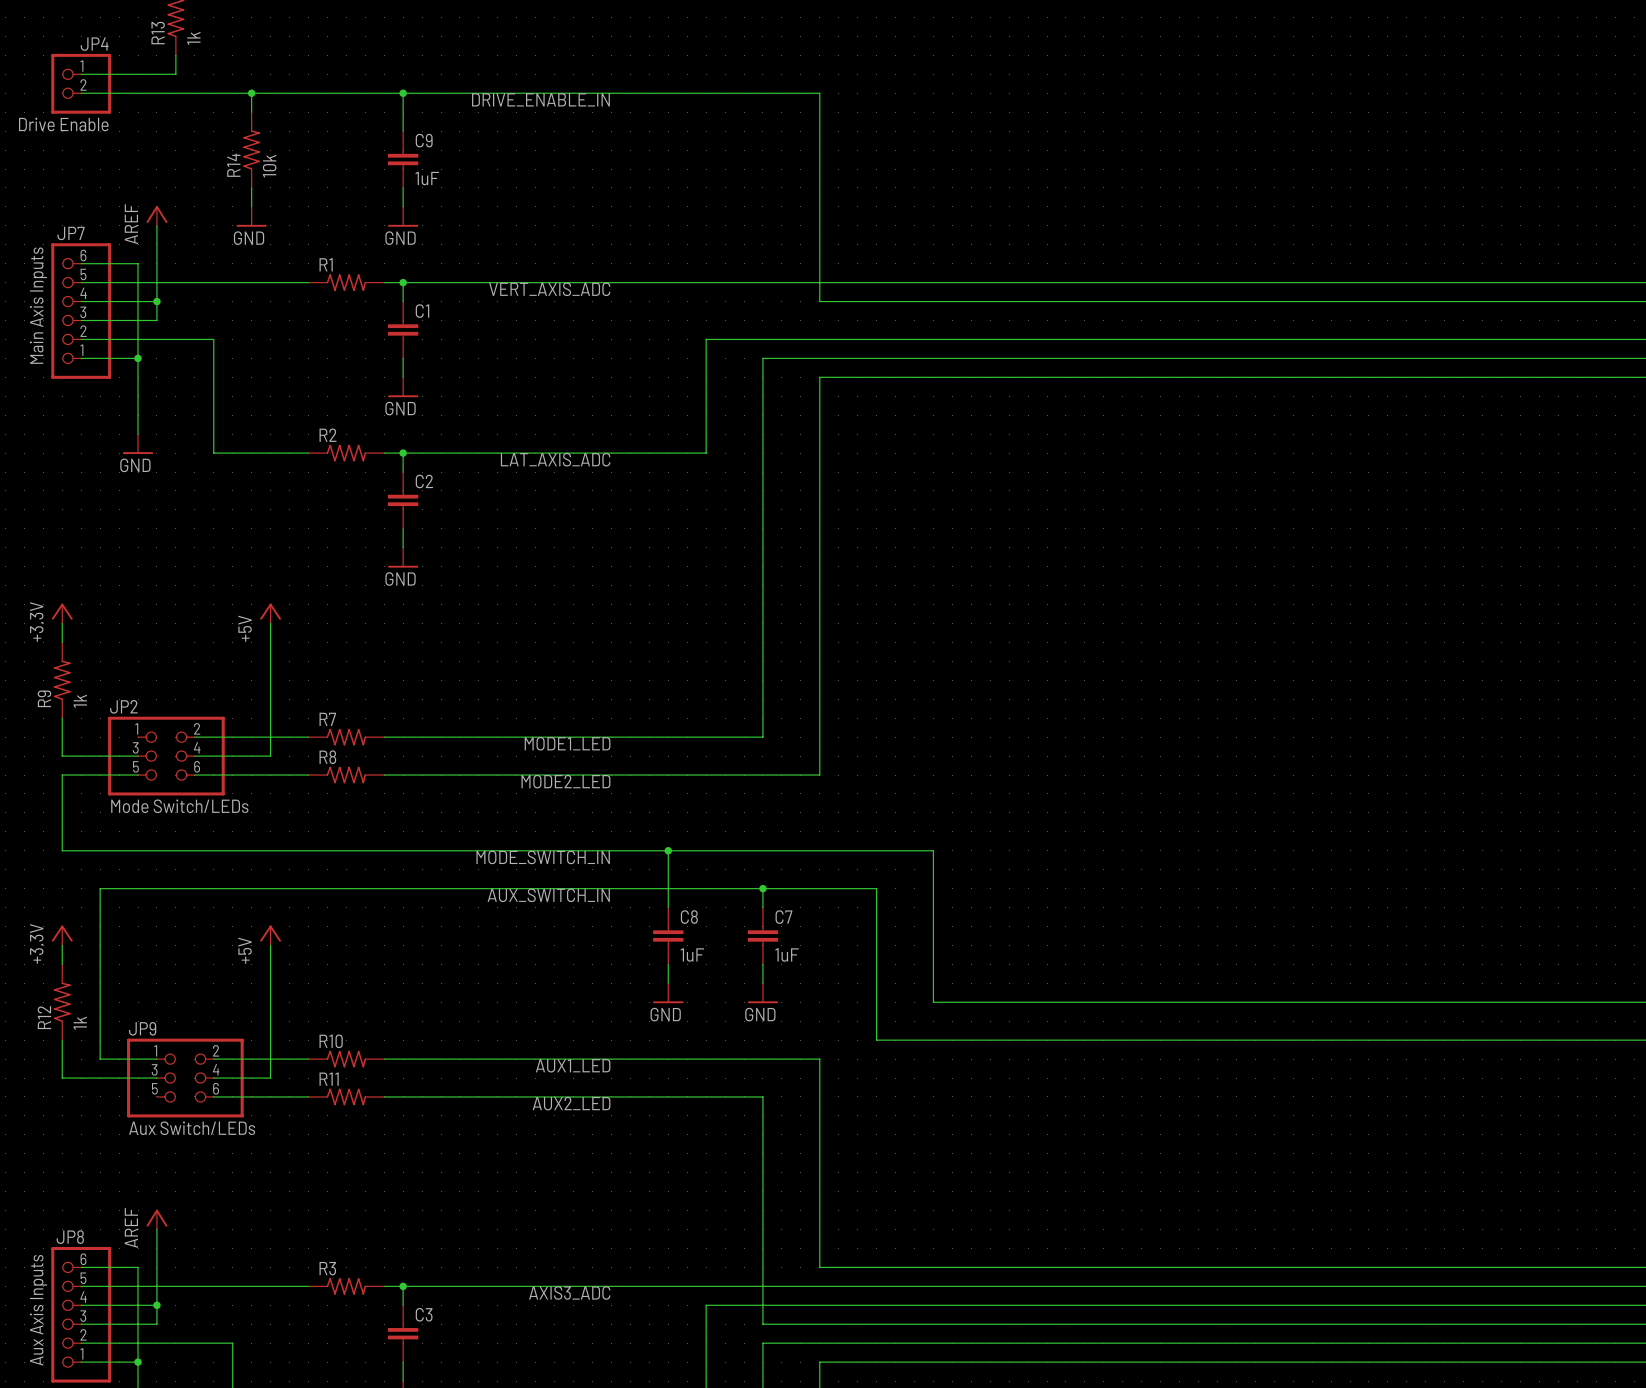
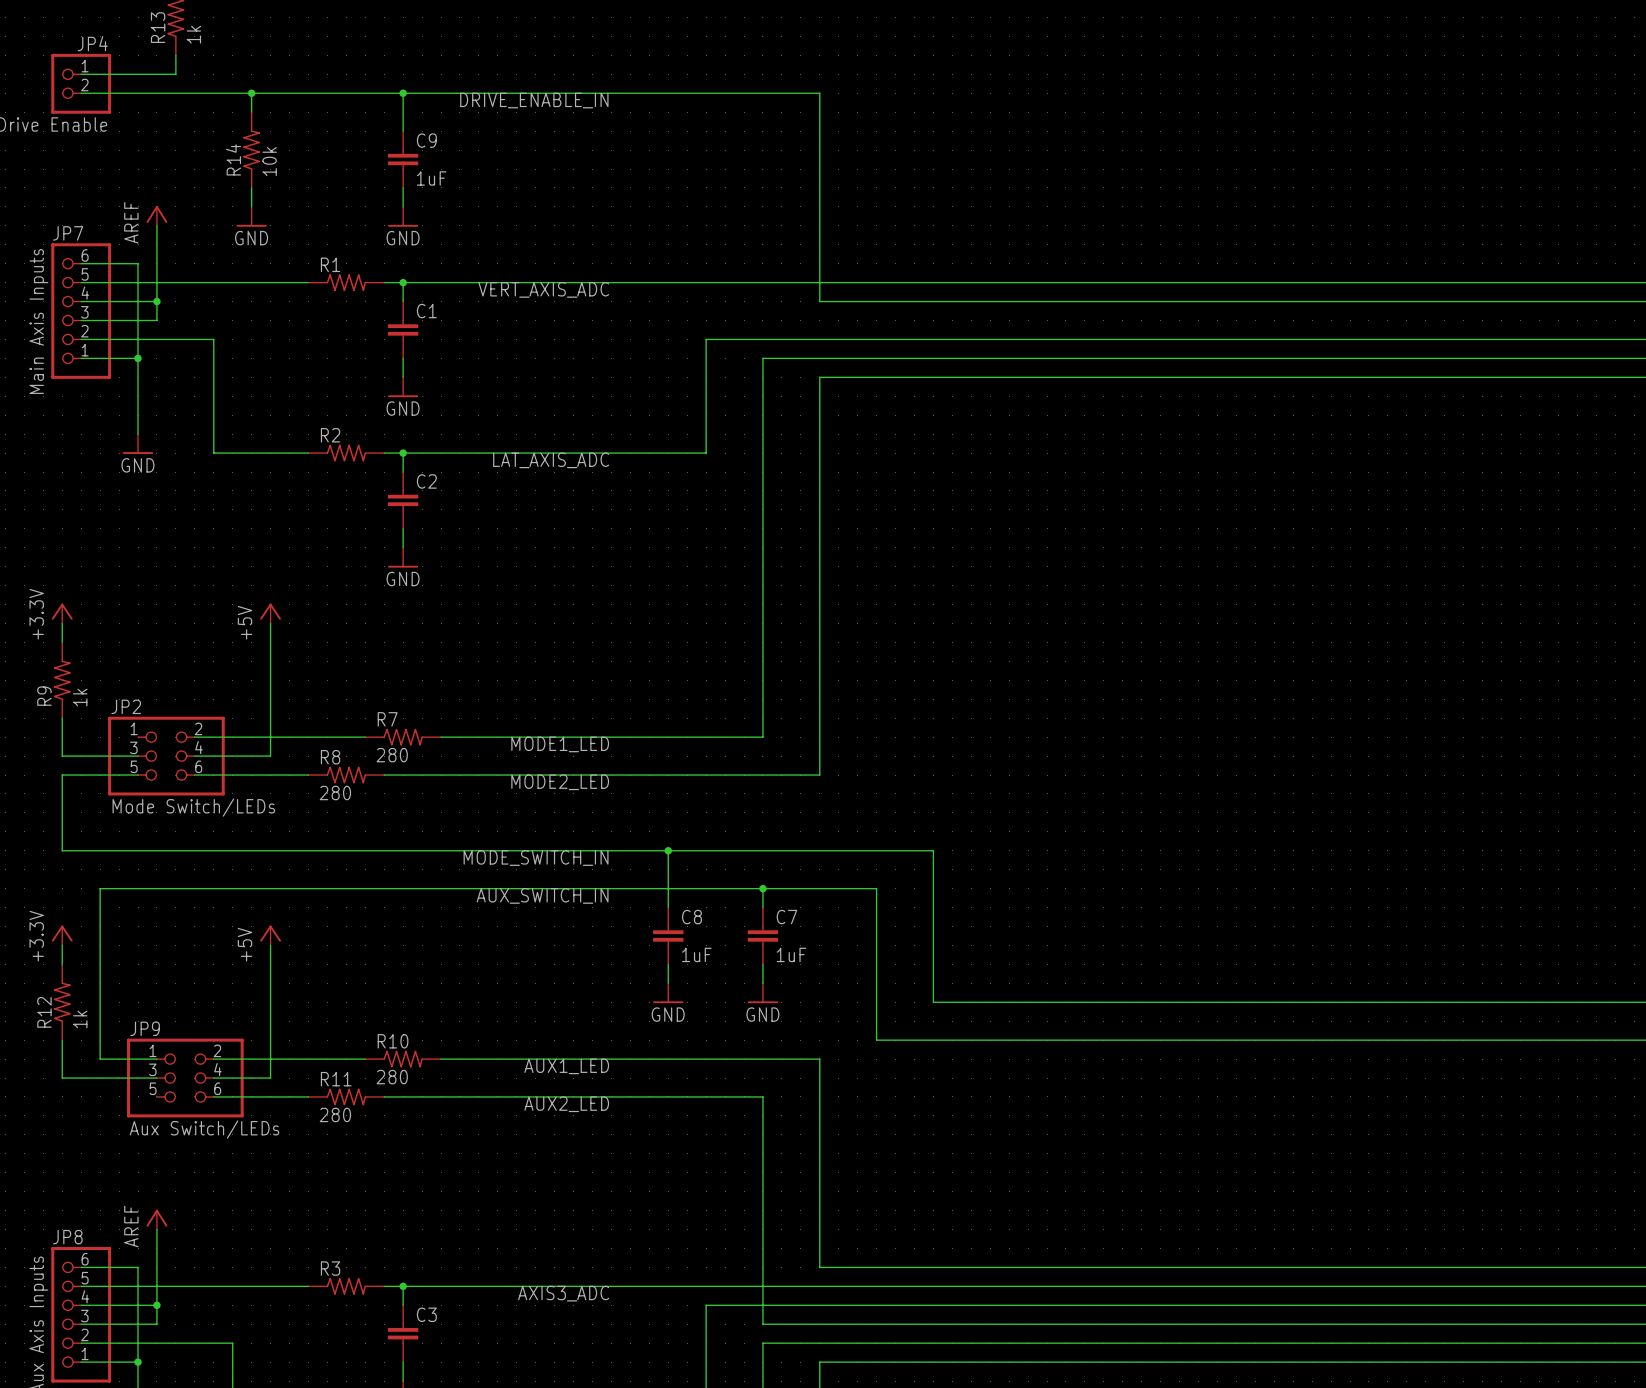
R7 position: (346, 737) -> (403, 737)
R7 value: none -> 280 (392, 755)
R8 value: none -> 280 (335, 793)
R10 position: (346, 1059) -> (403, 1059)
R10 value: none -> 280 (392, 1077)
R11 value: none -> 280 (335, 1114)

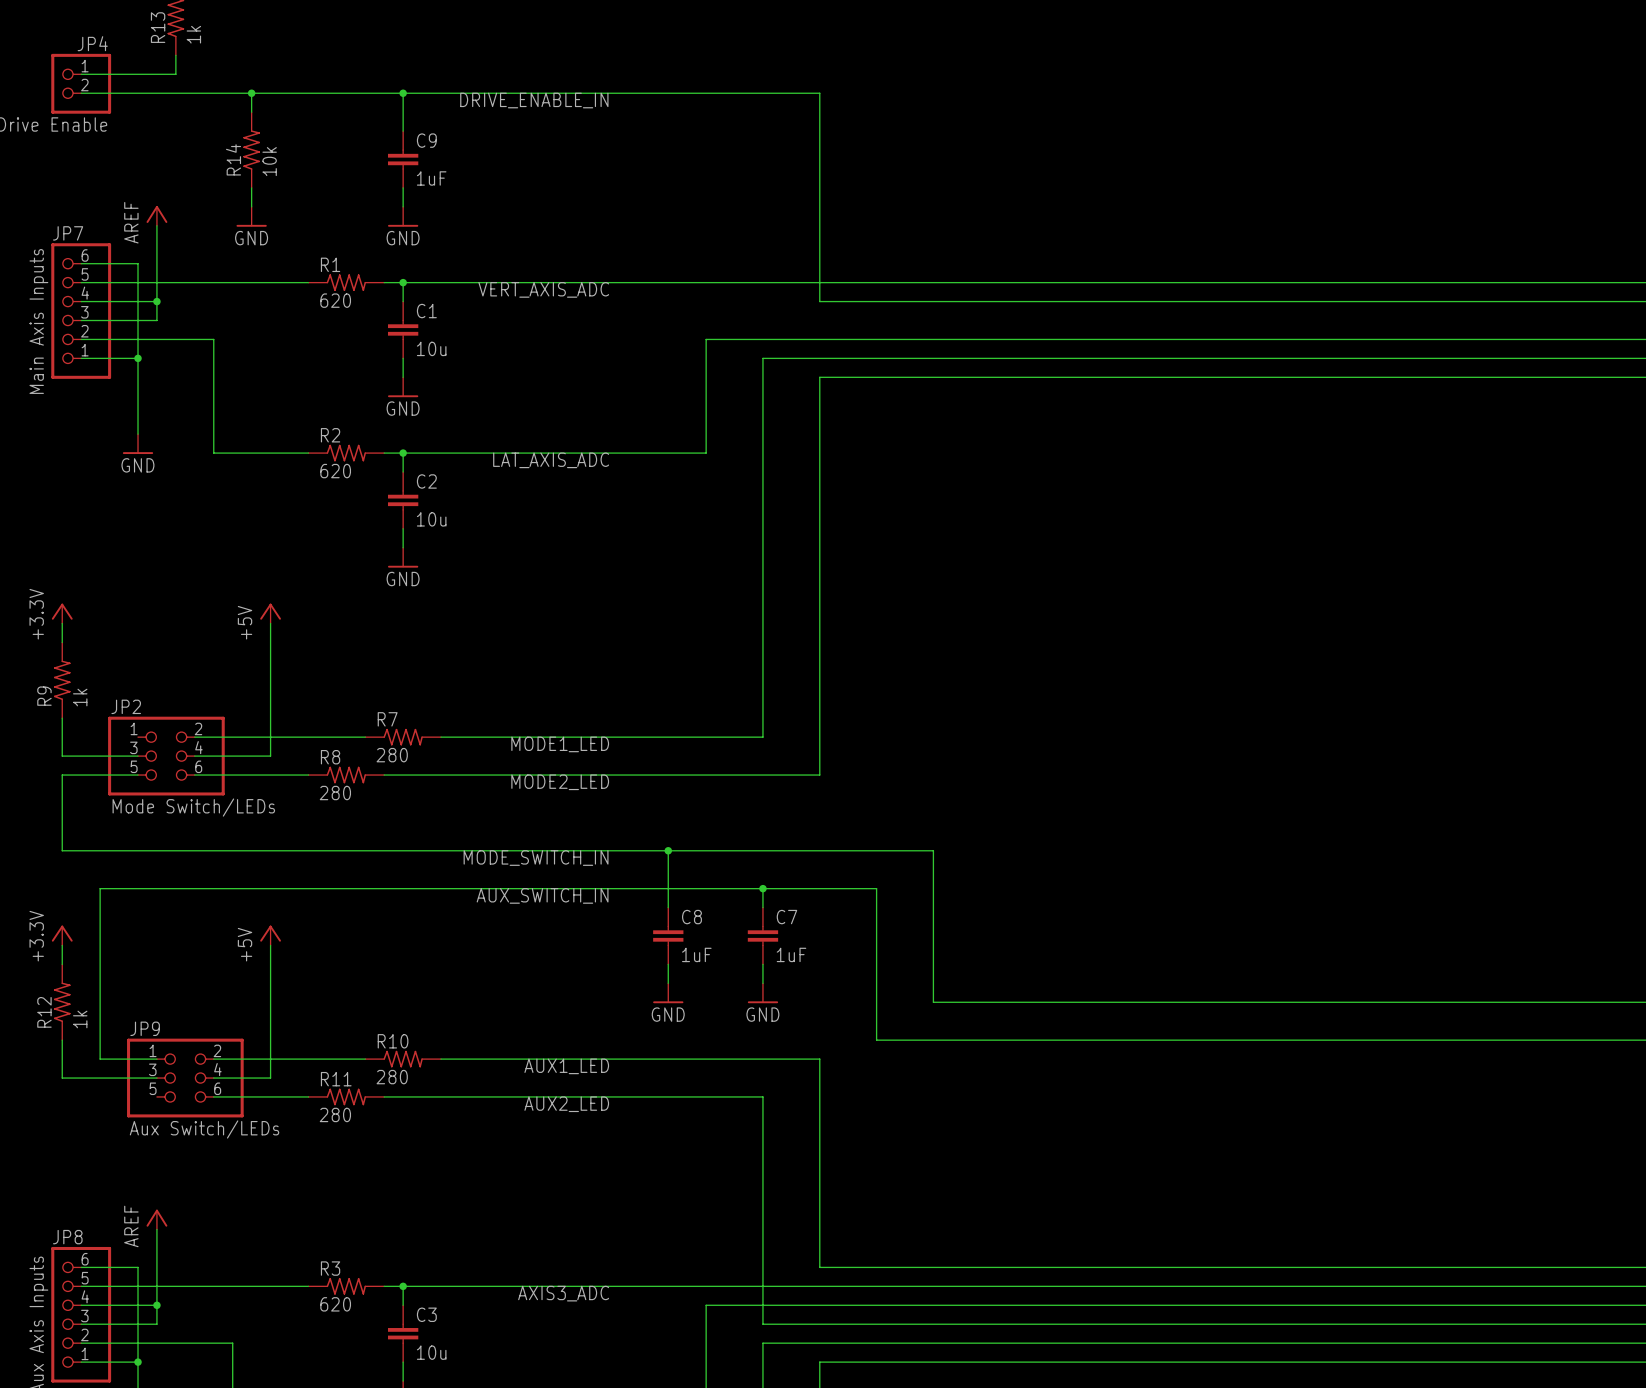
R1 value: none -> 620 (335, 300)
C1 value: none -> 10u (431, 348)
R2 value: none -> 620 (335, 471)
C2 value: none -> 10u (431, 519)
R3 value: none -> 620 (335, 1304)
C3 value: none -> 10u (431, 1352)

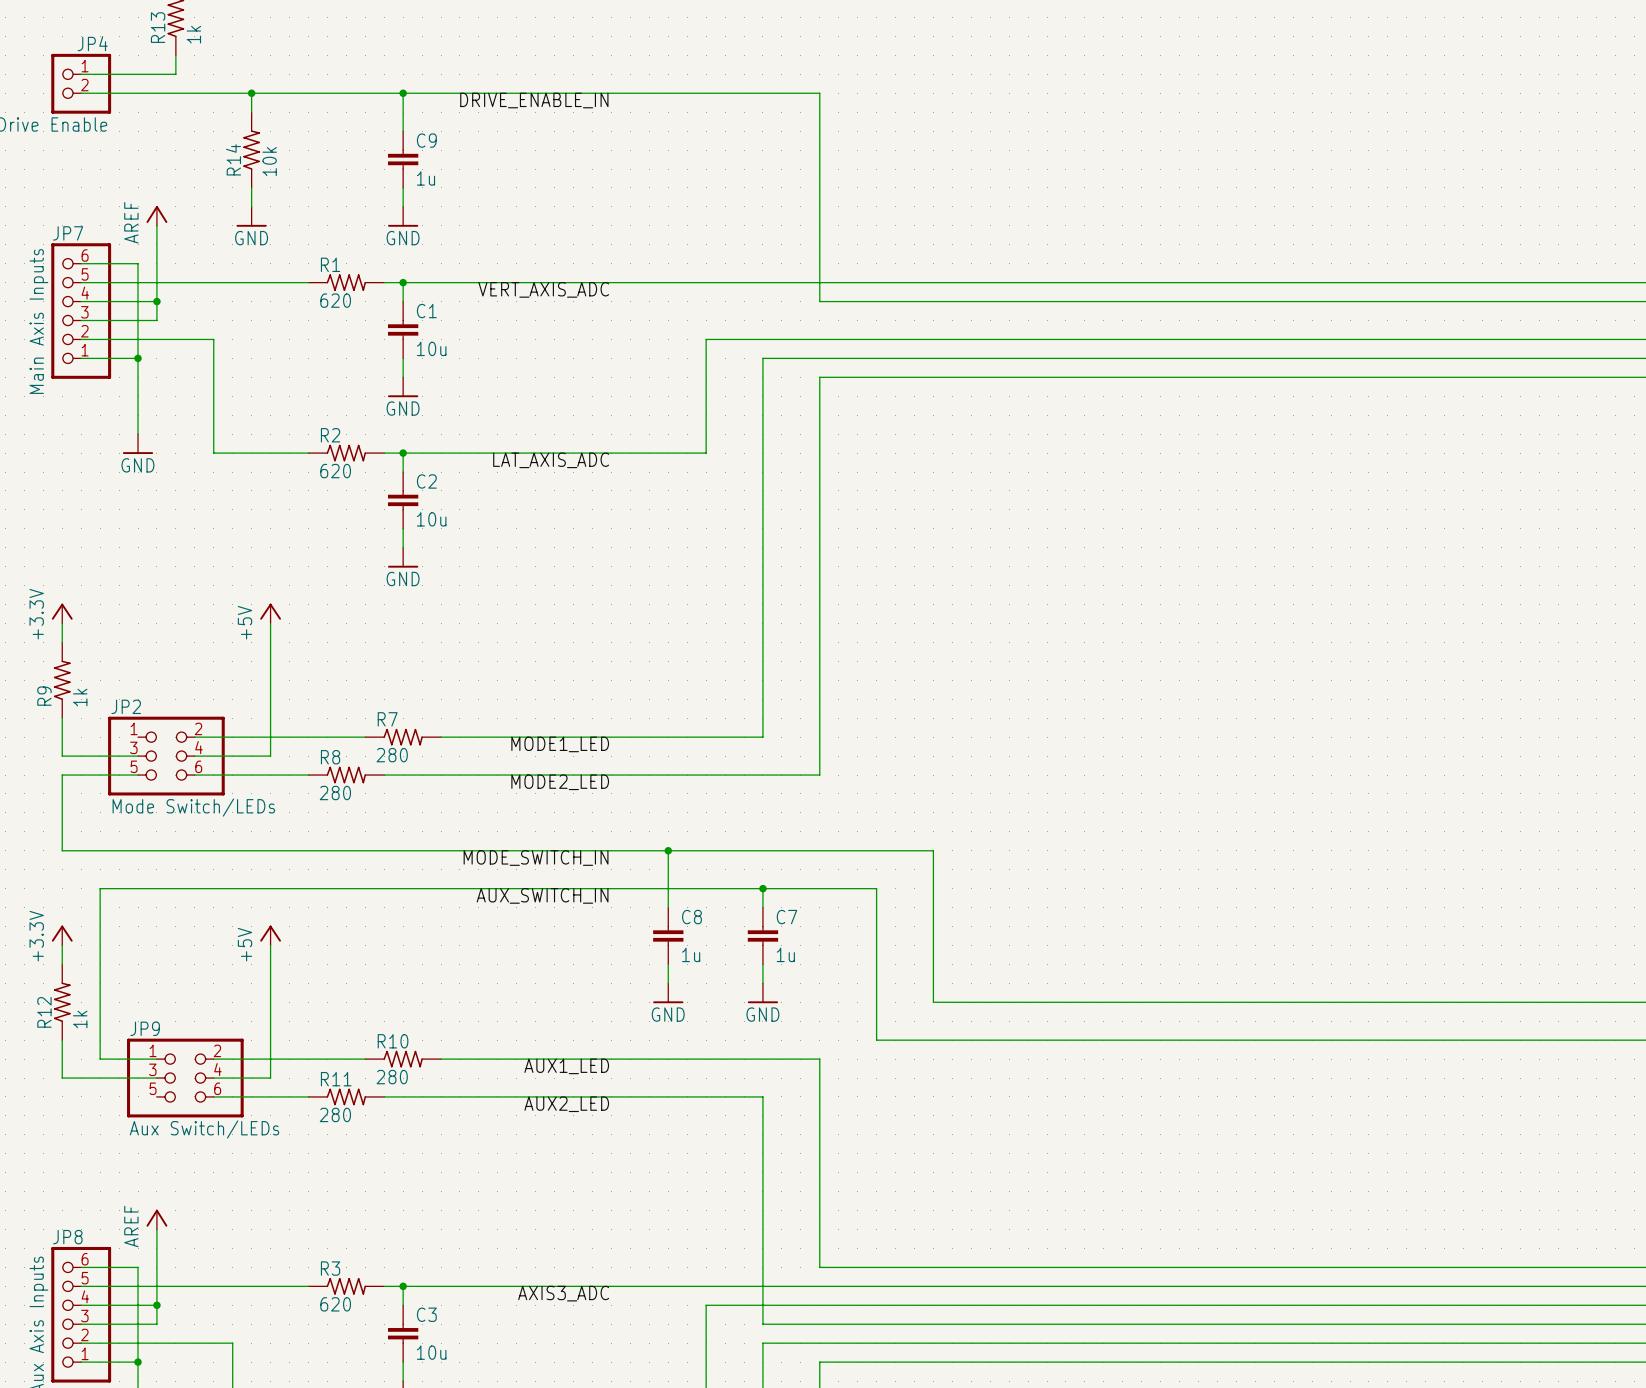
C9 value: 1uF (431, 178) -> 1u (425, 178)
C8 value: 1uF (696, 954) -> 1u (691, 954)
C7 value: 1uF (791, 954) -> 1u (785, 954)

